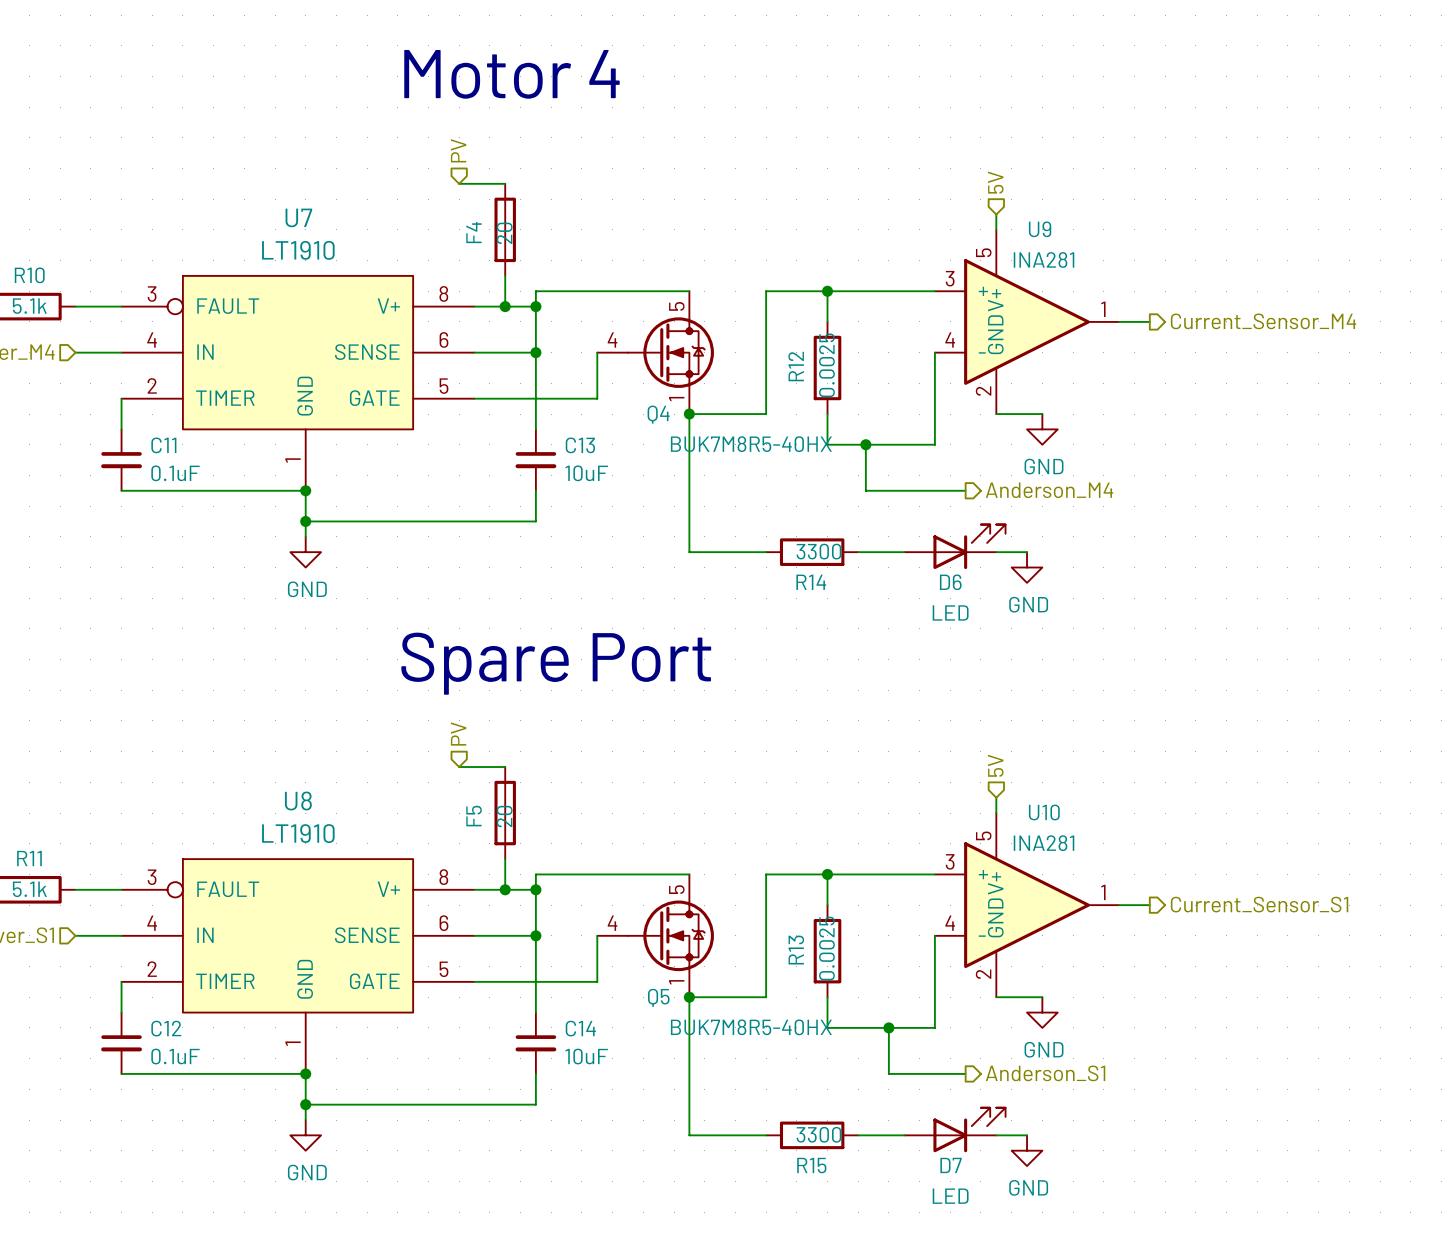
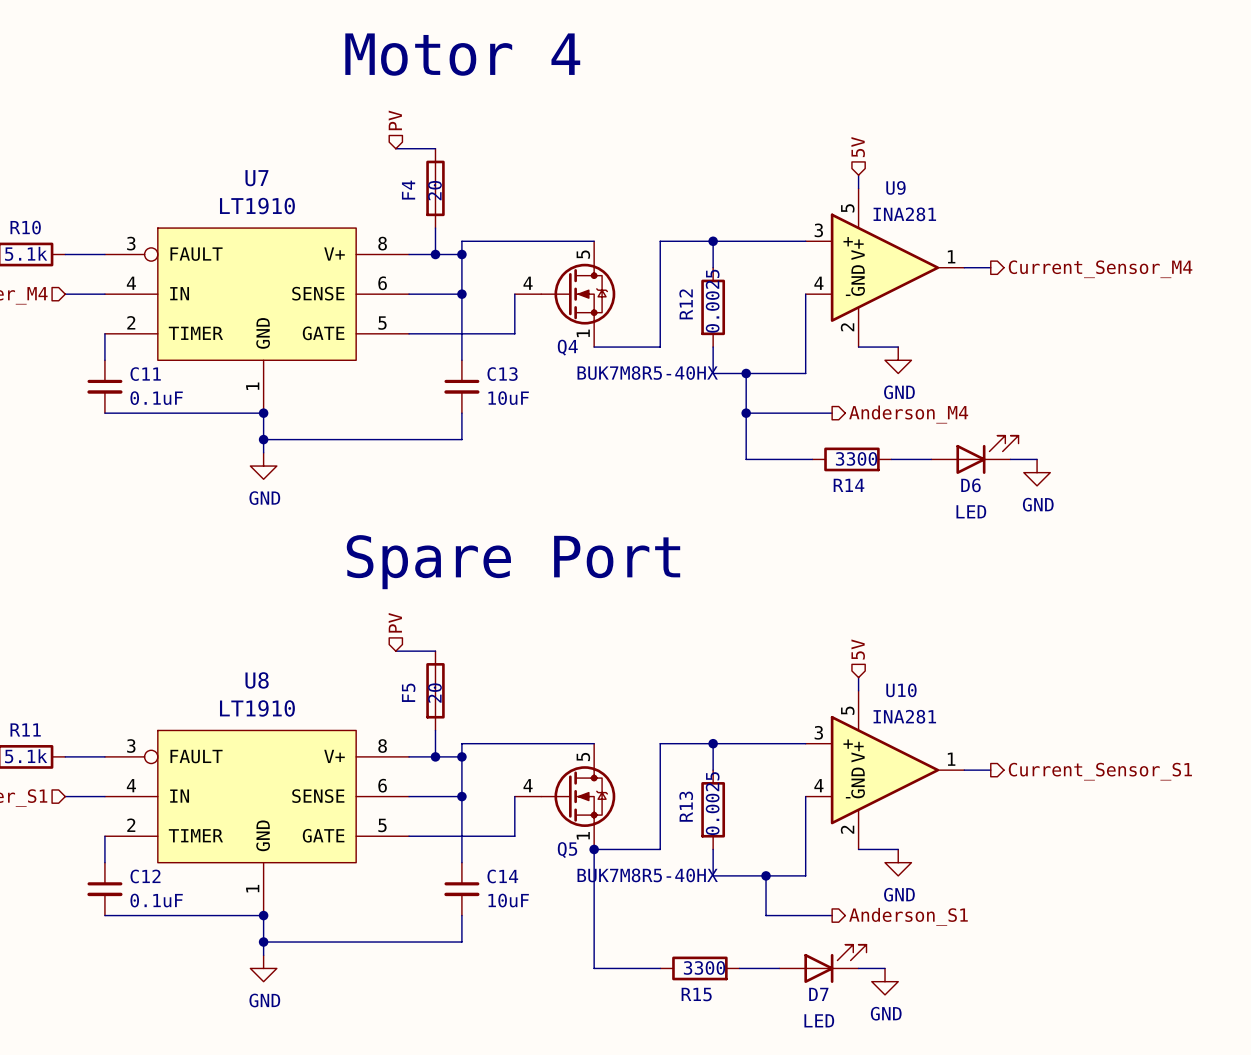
wire: (689, 414) (689, 552) (766, 552) -> none
junction: (689, 414) -> none
wire: none -> (746, 413) (746, 459) (812, 459)
junction: none -> (746, 413)
D6 position: (954, 546) -> (974, 454)
R14 position: (812, 552) -> (851, 459)
wire: (858, 552) (904, 552) -> (891, 459) (931, 459)
wire: (996, 552) (1027, 552) -> (1010, 459) (1037, 459)
power symbol position: GND (1027, 567) -> GND (1037, 472)

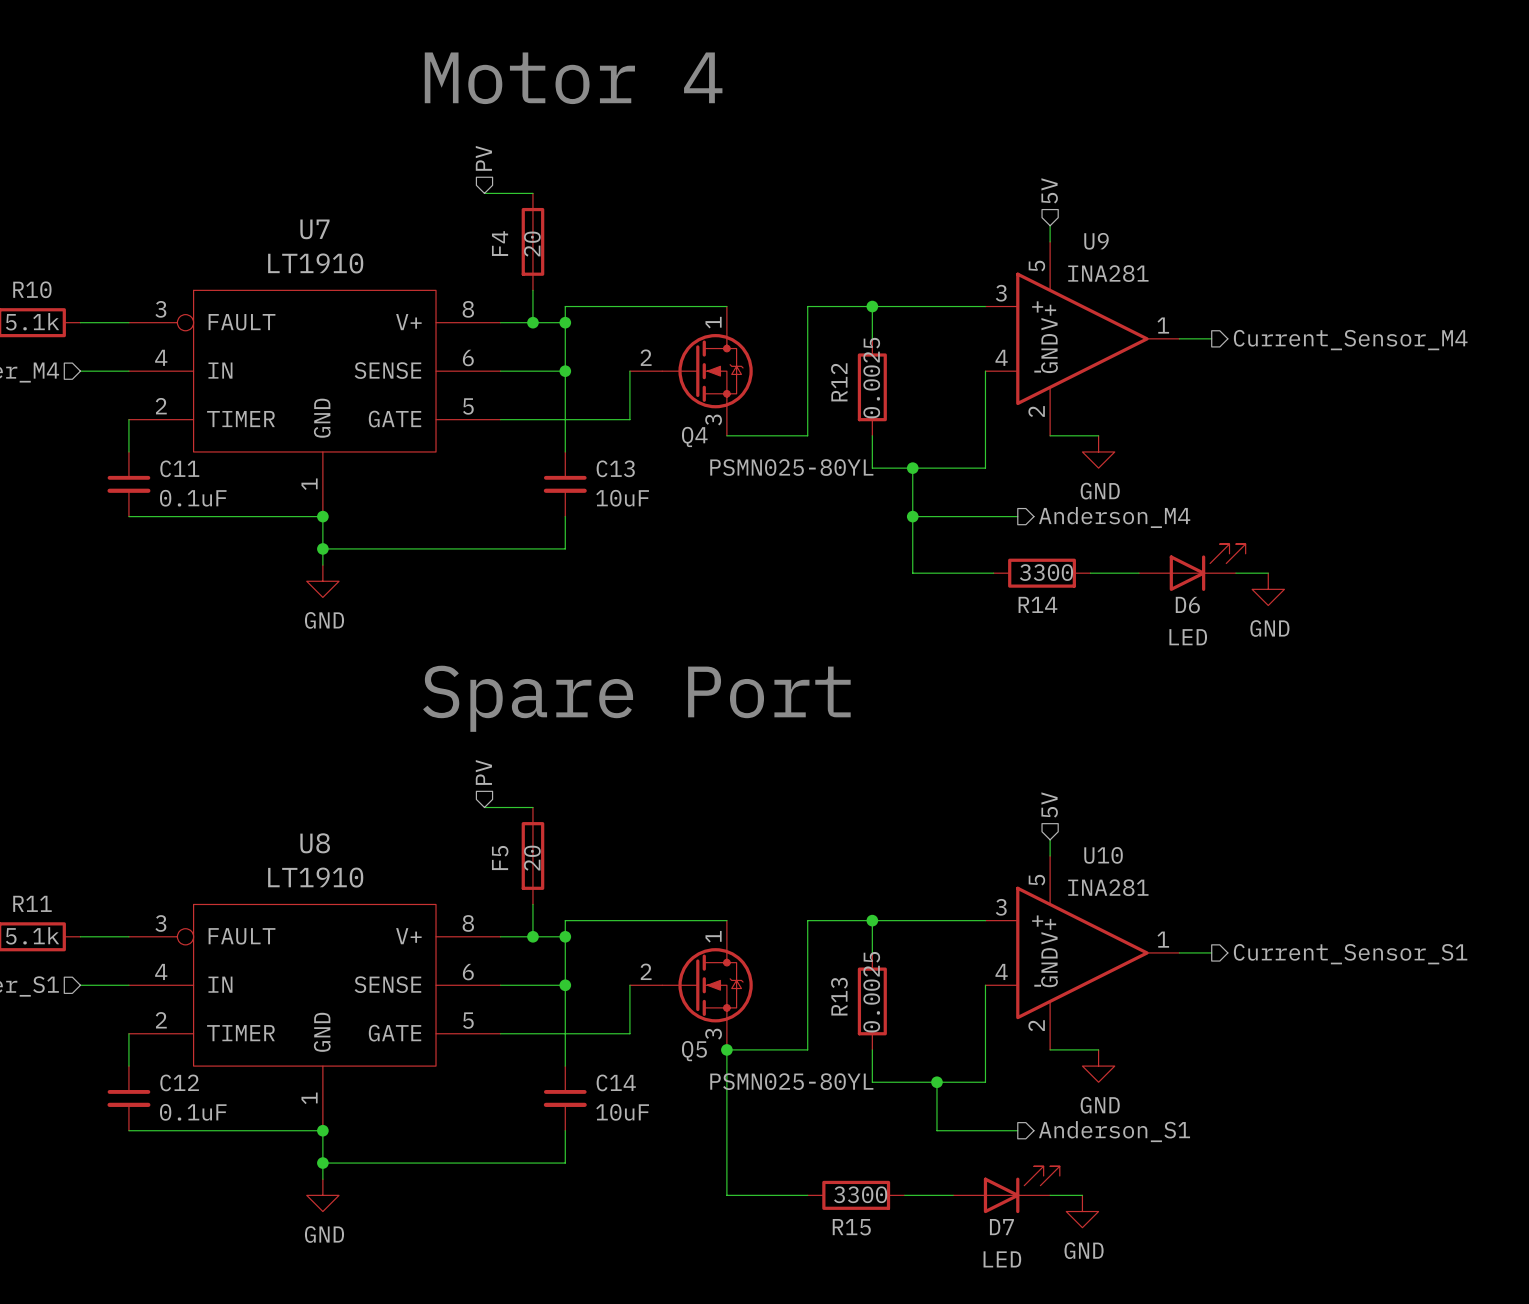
Q4 pin number: 5 (583, 254) -> 1 (713, 322)
Q4 pin number: 4 (528, 283) -> 2 (646, 357)
Q4 pin number: 1 (583, 333) -> 3 (713, 420)
Q4 value: BUK7M8R5-40HX (647, 373) -> PSMN025-80YL (791, 467)
Q5 pin number: 5 (583, 757) -> 1 (713, 936)
Q5 pin number: 4 (528, 785) -> 2 (646, 971)
Q5 pin number: 1 (583, 835) -> 3 (713, 1034)
Q5 value: BUK7M8R5-40HX (647, 875) -> PSMN025-80YL (791, 1081)

